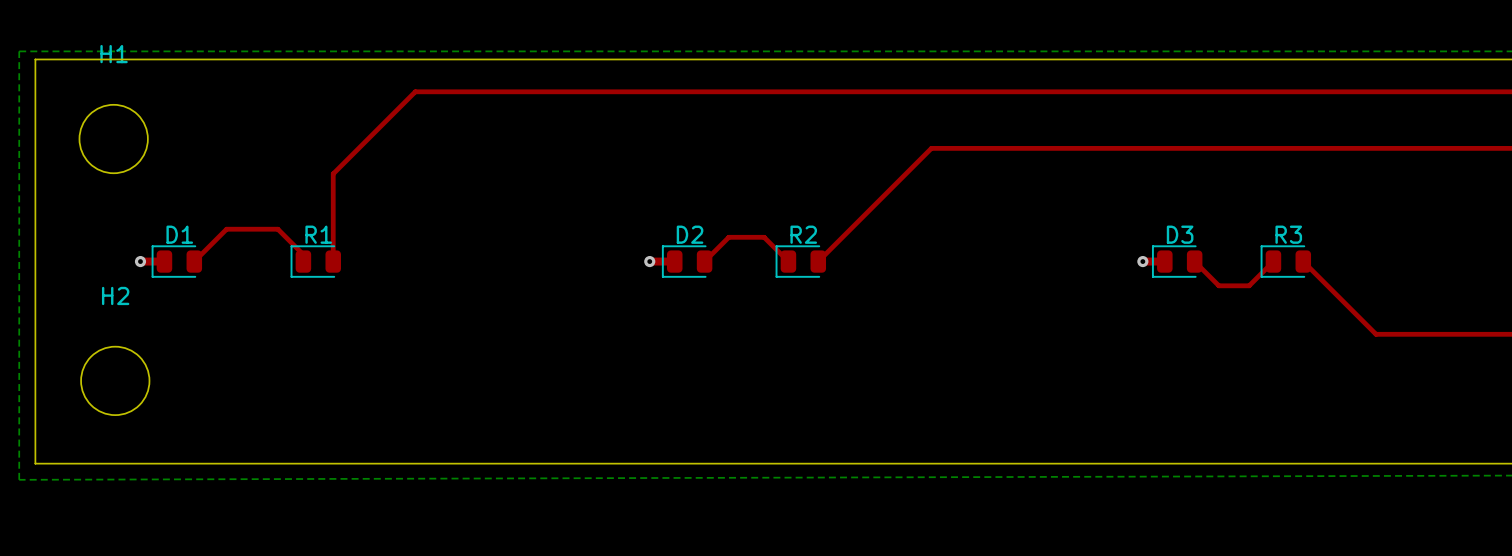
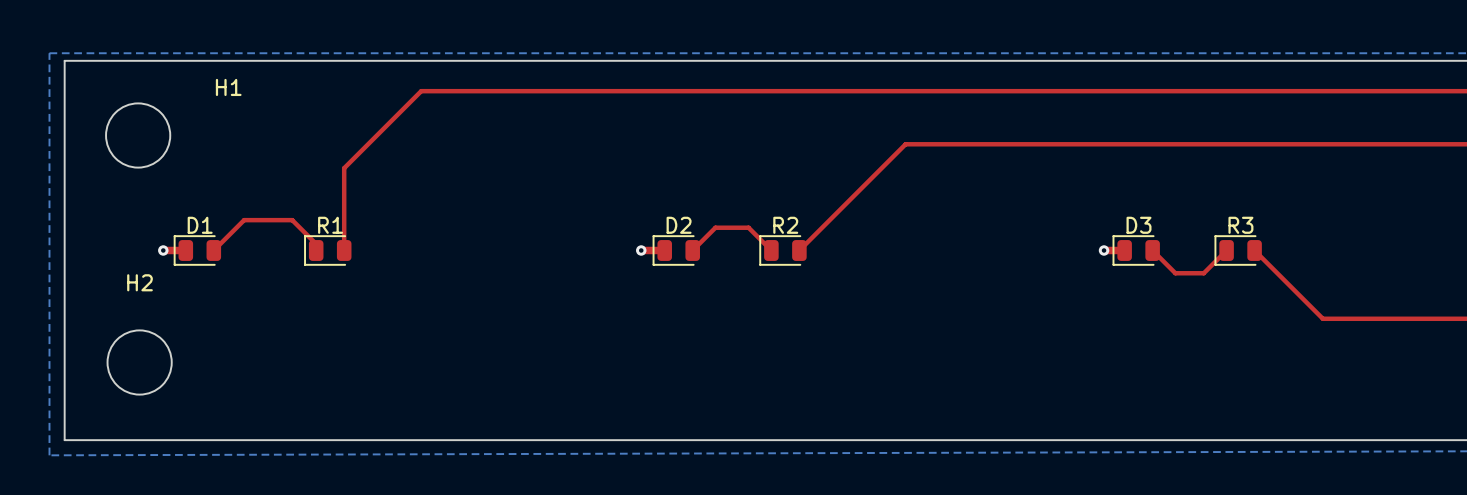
H1 name position: H1 (114, 54) -> H1 (228, 87)

